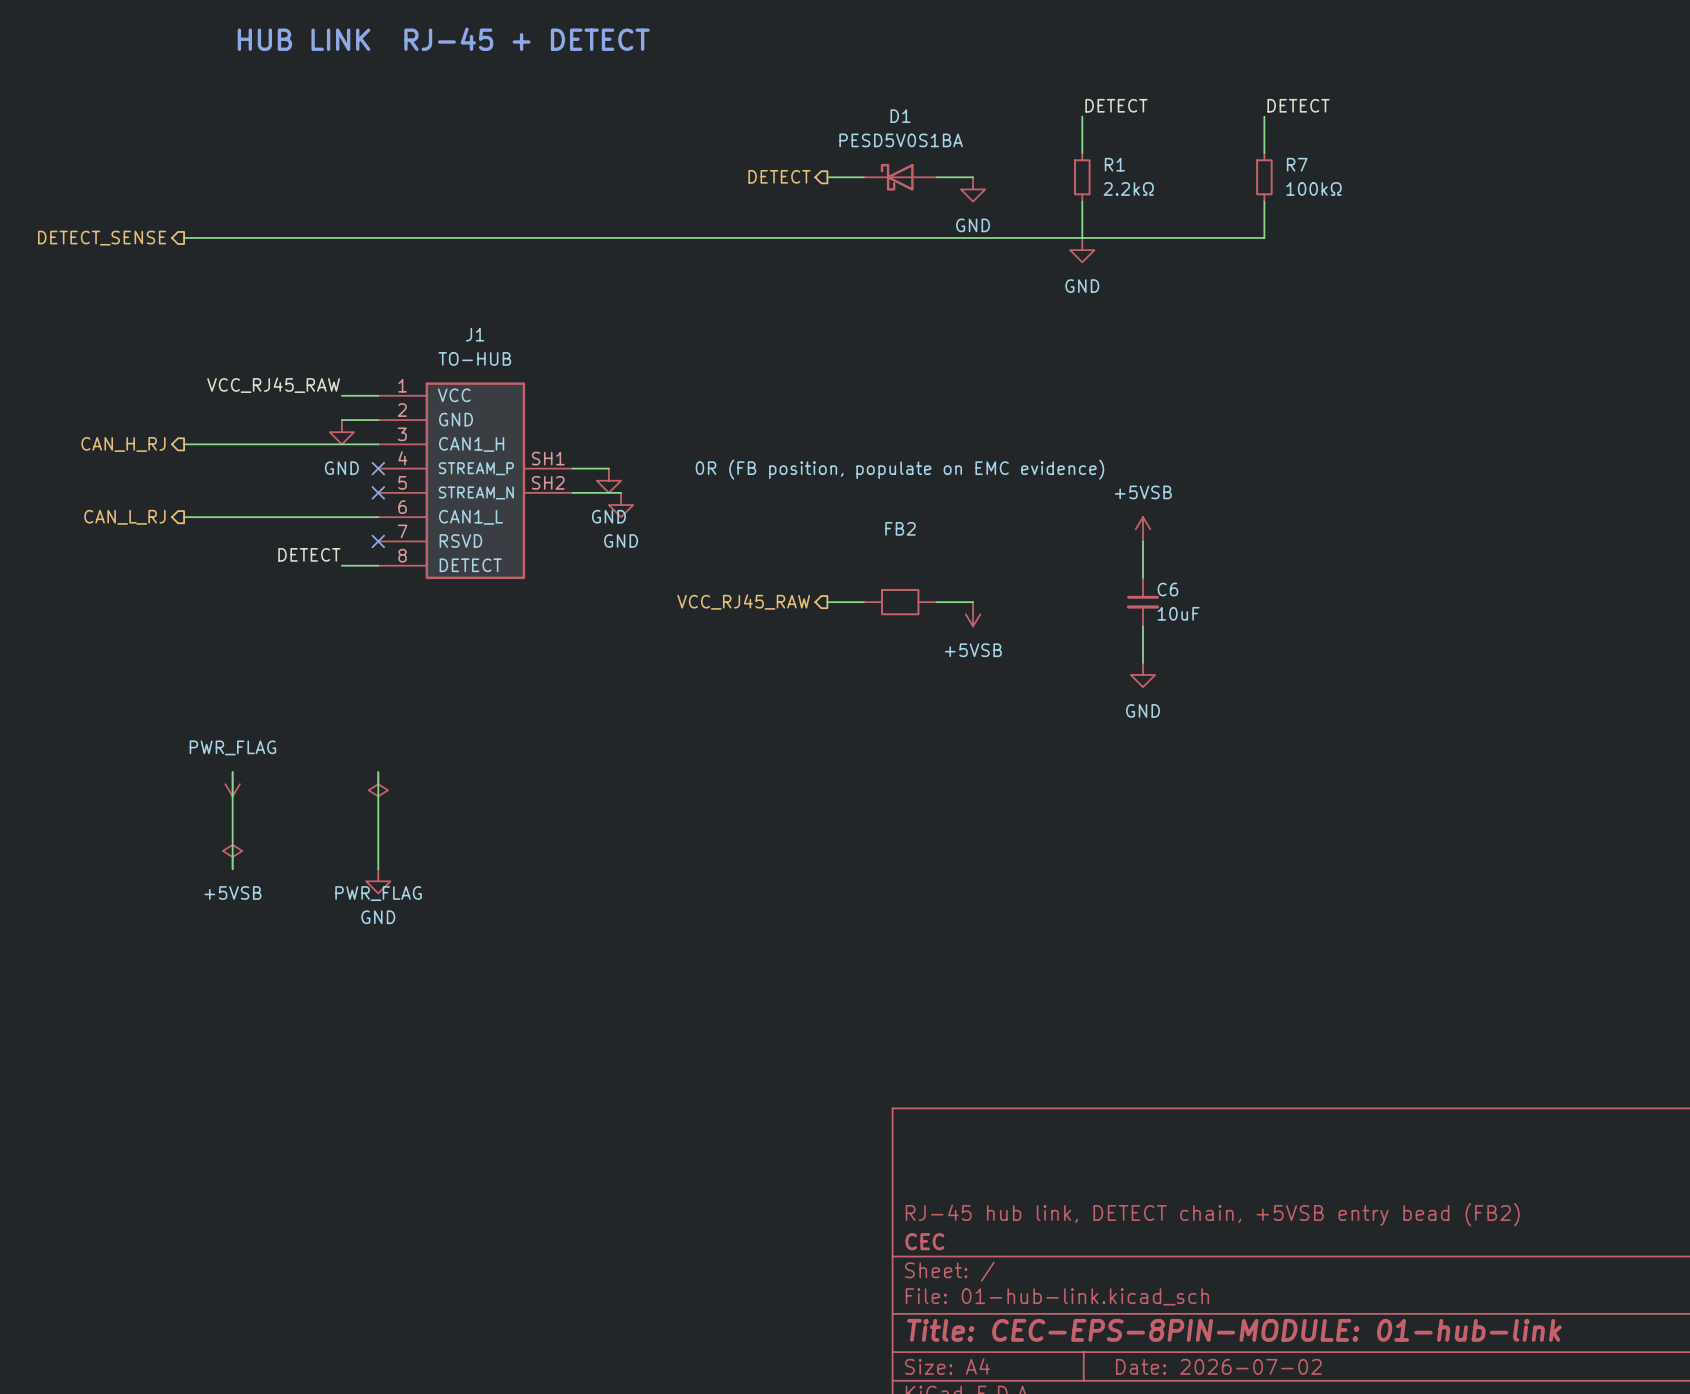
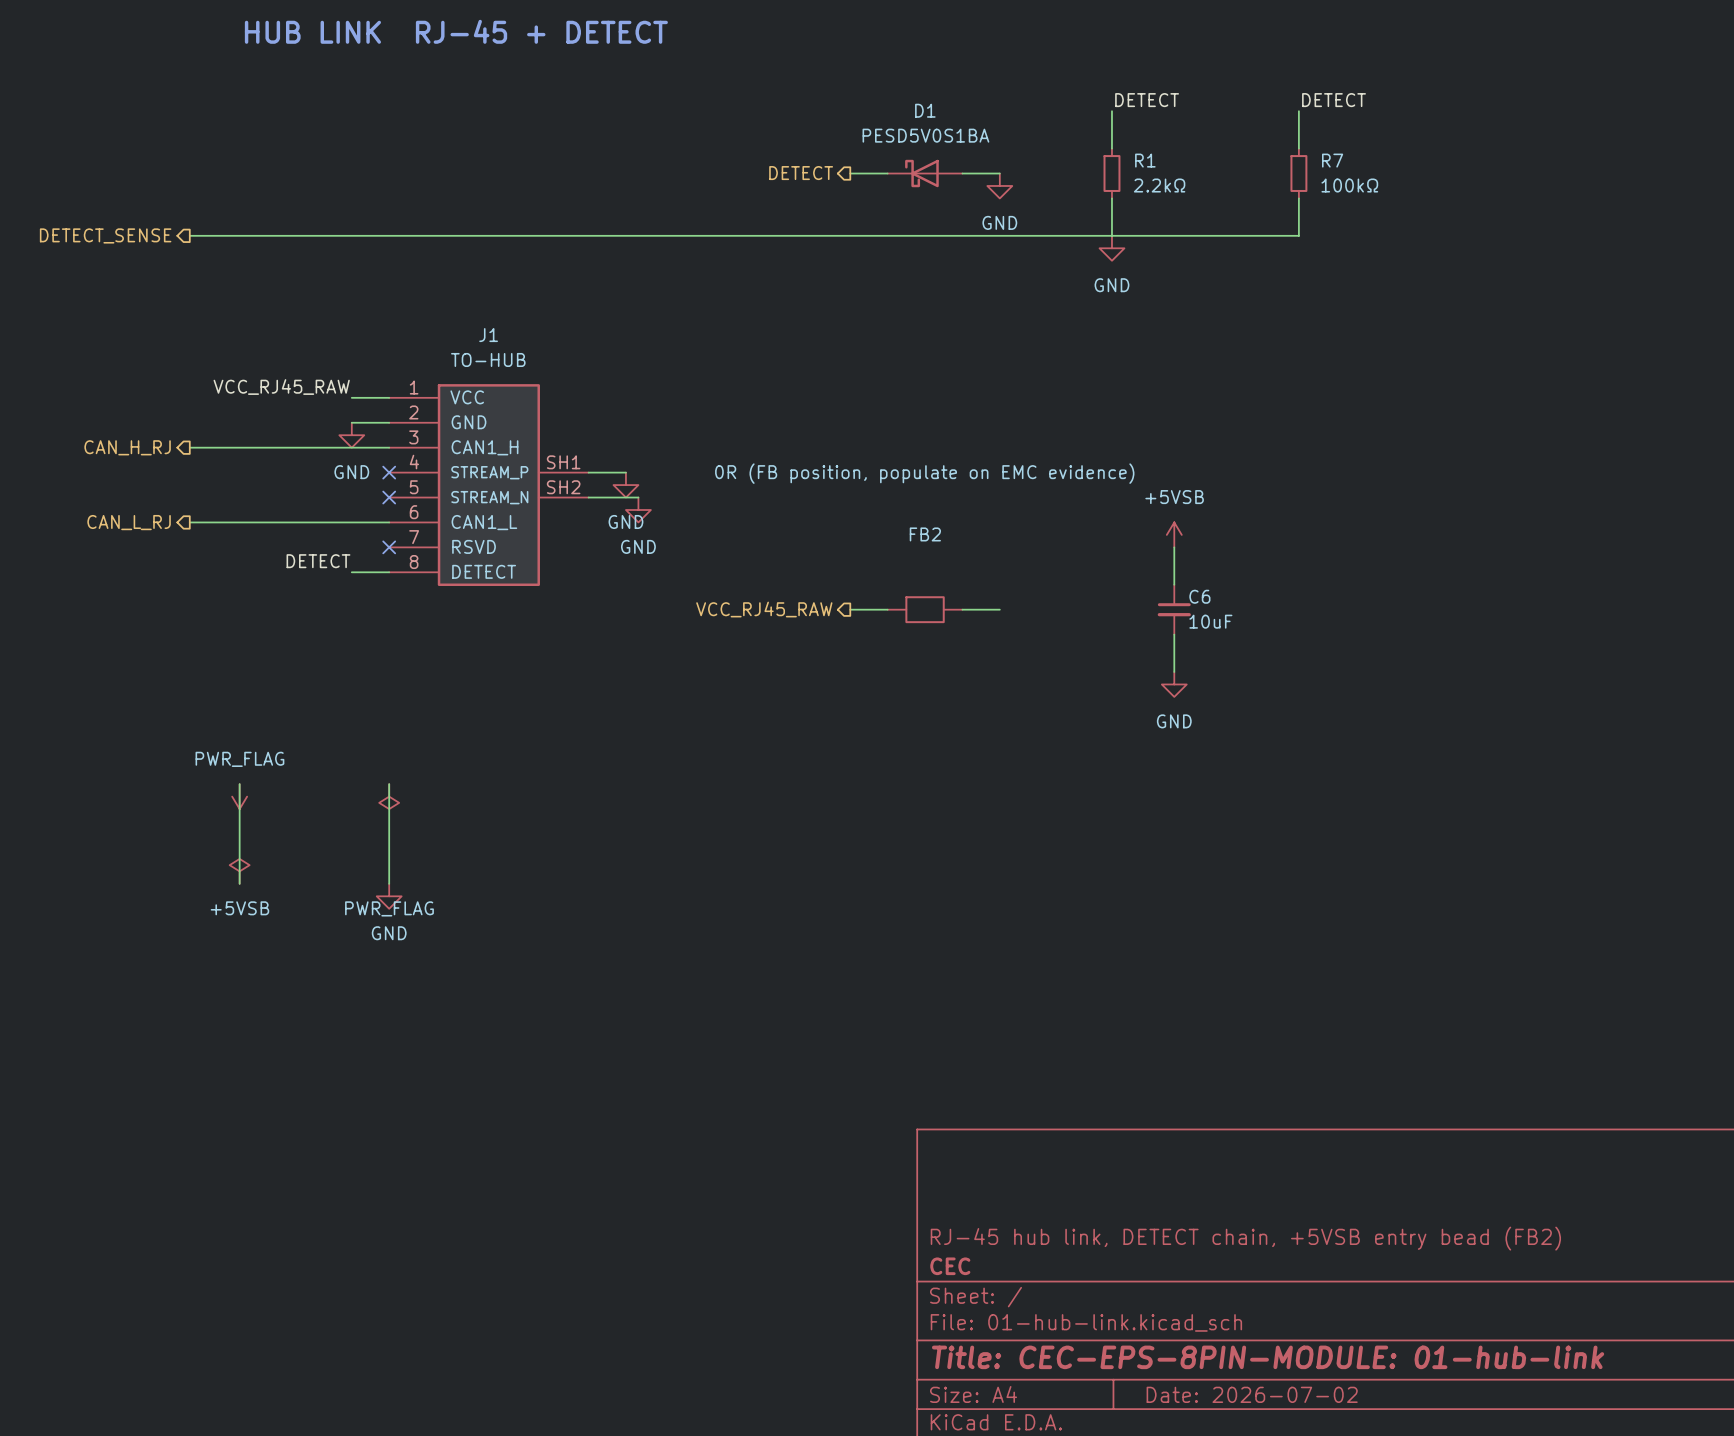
power symbol: +5VSB (973, 614) -> none

